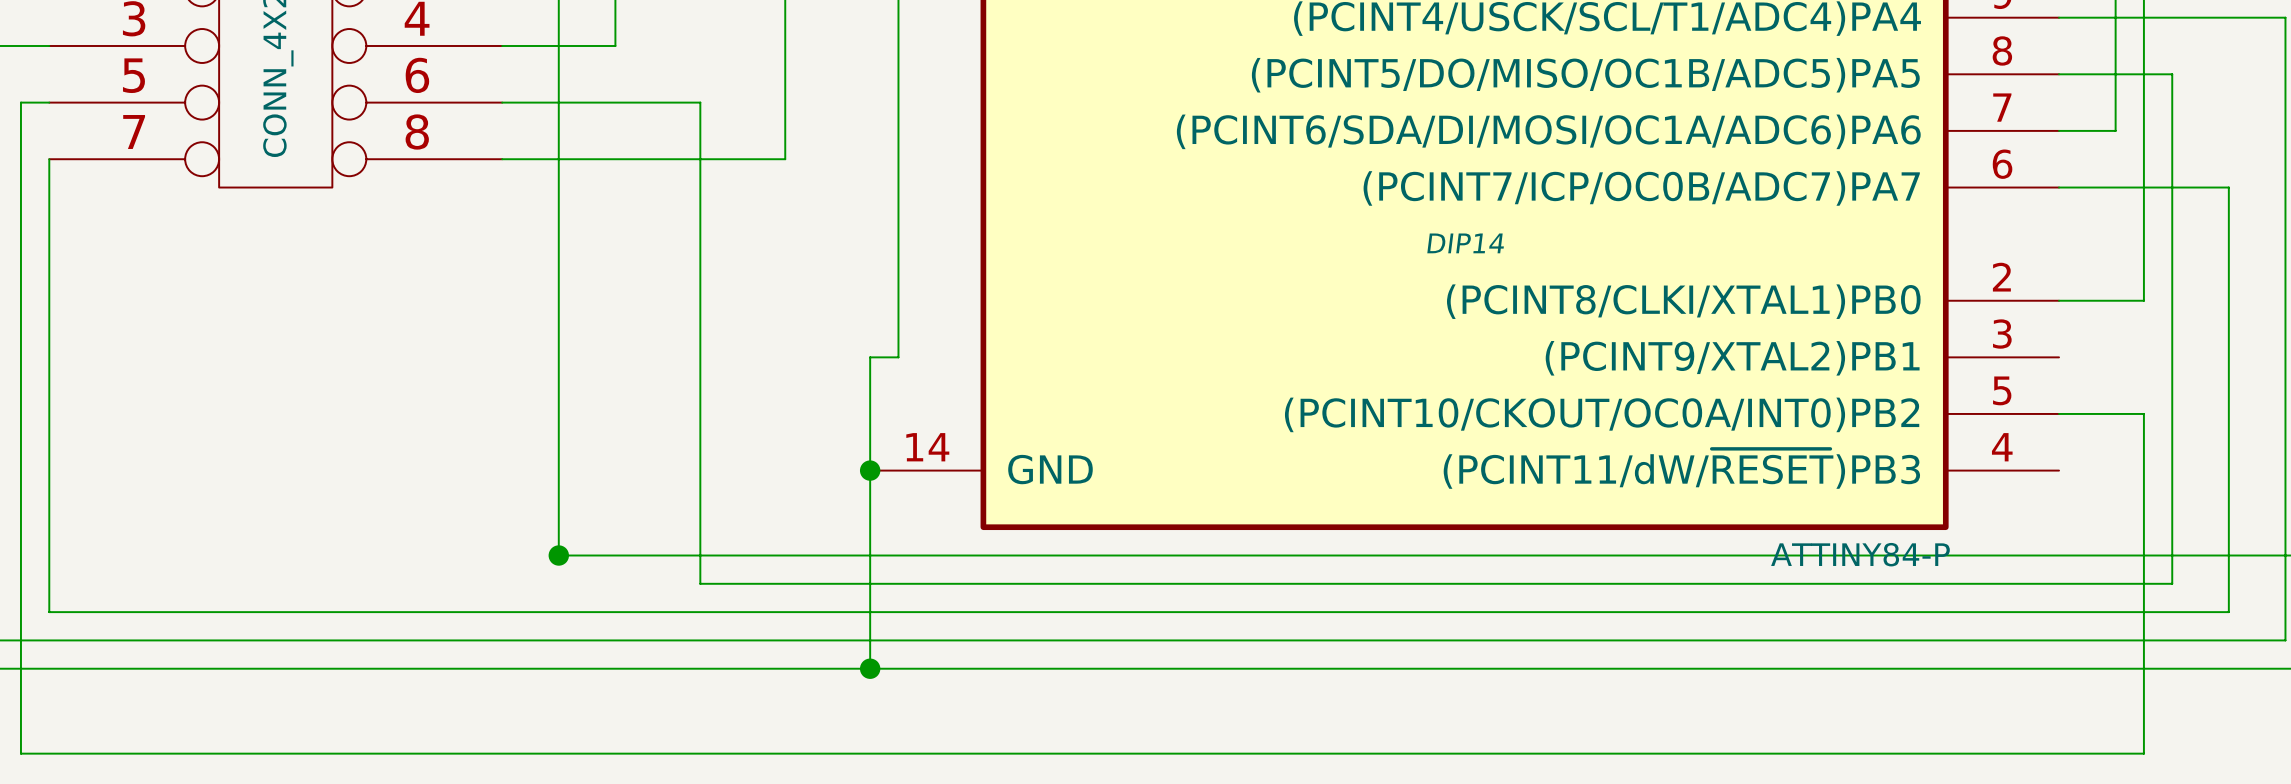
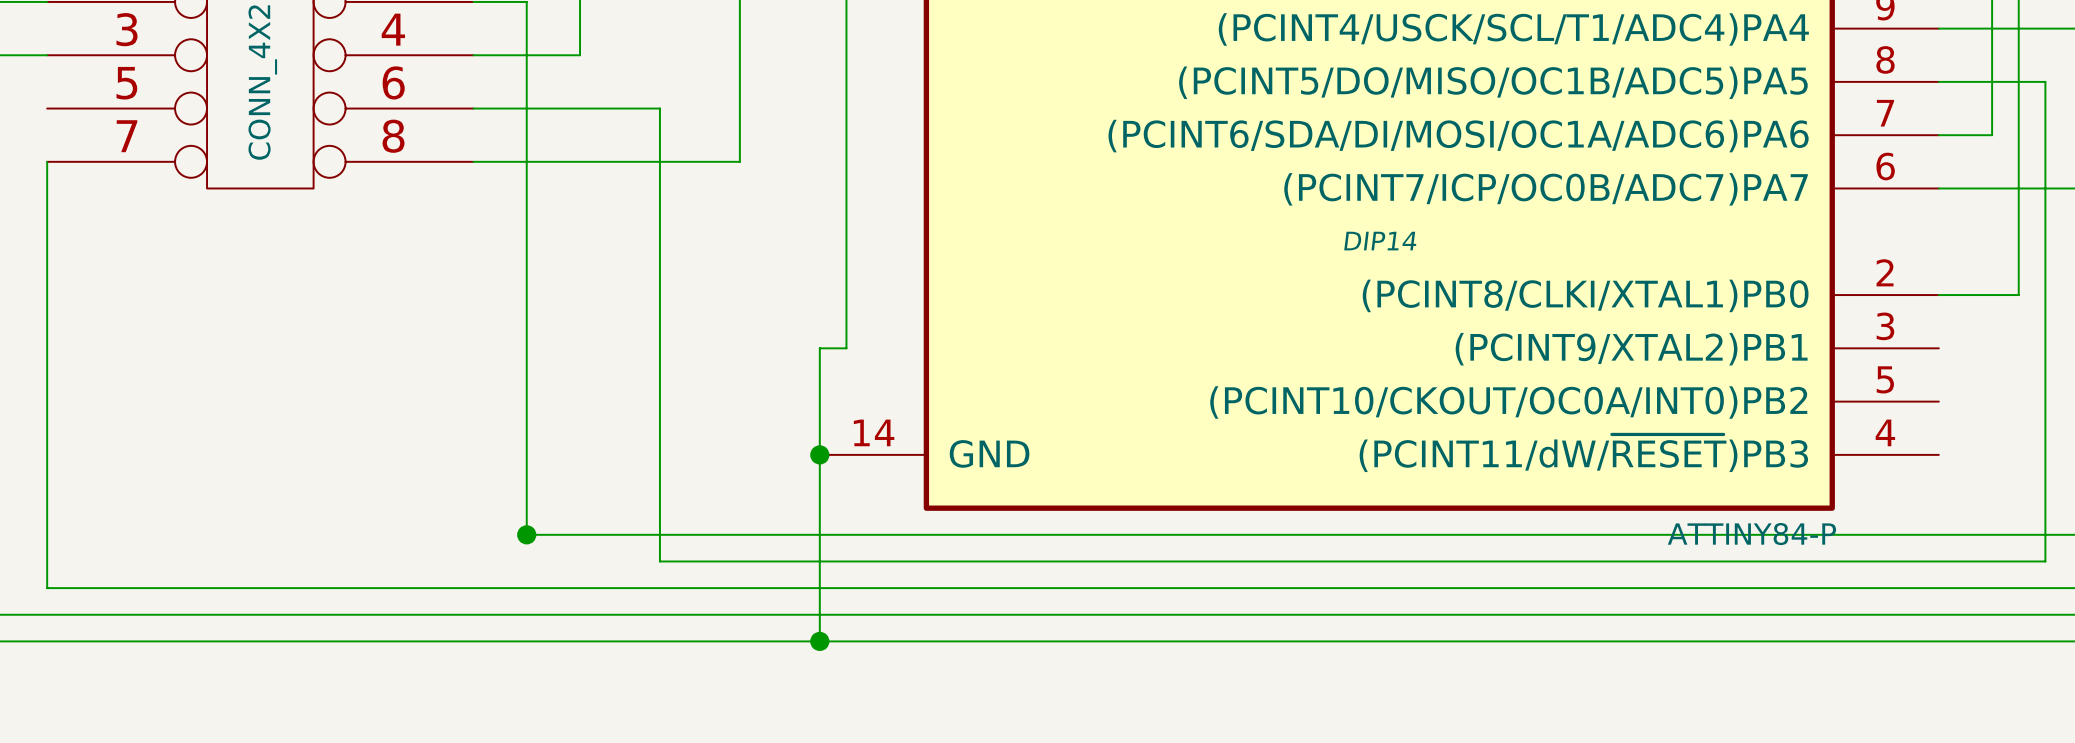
wire: (49, 102) (20, 102) (20, 753) (2143, 753) (2143, 413) (2059, 413) -> none

